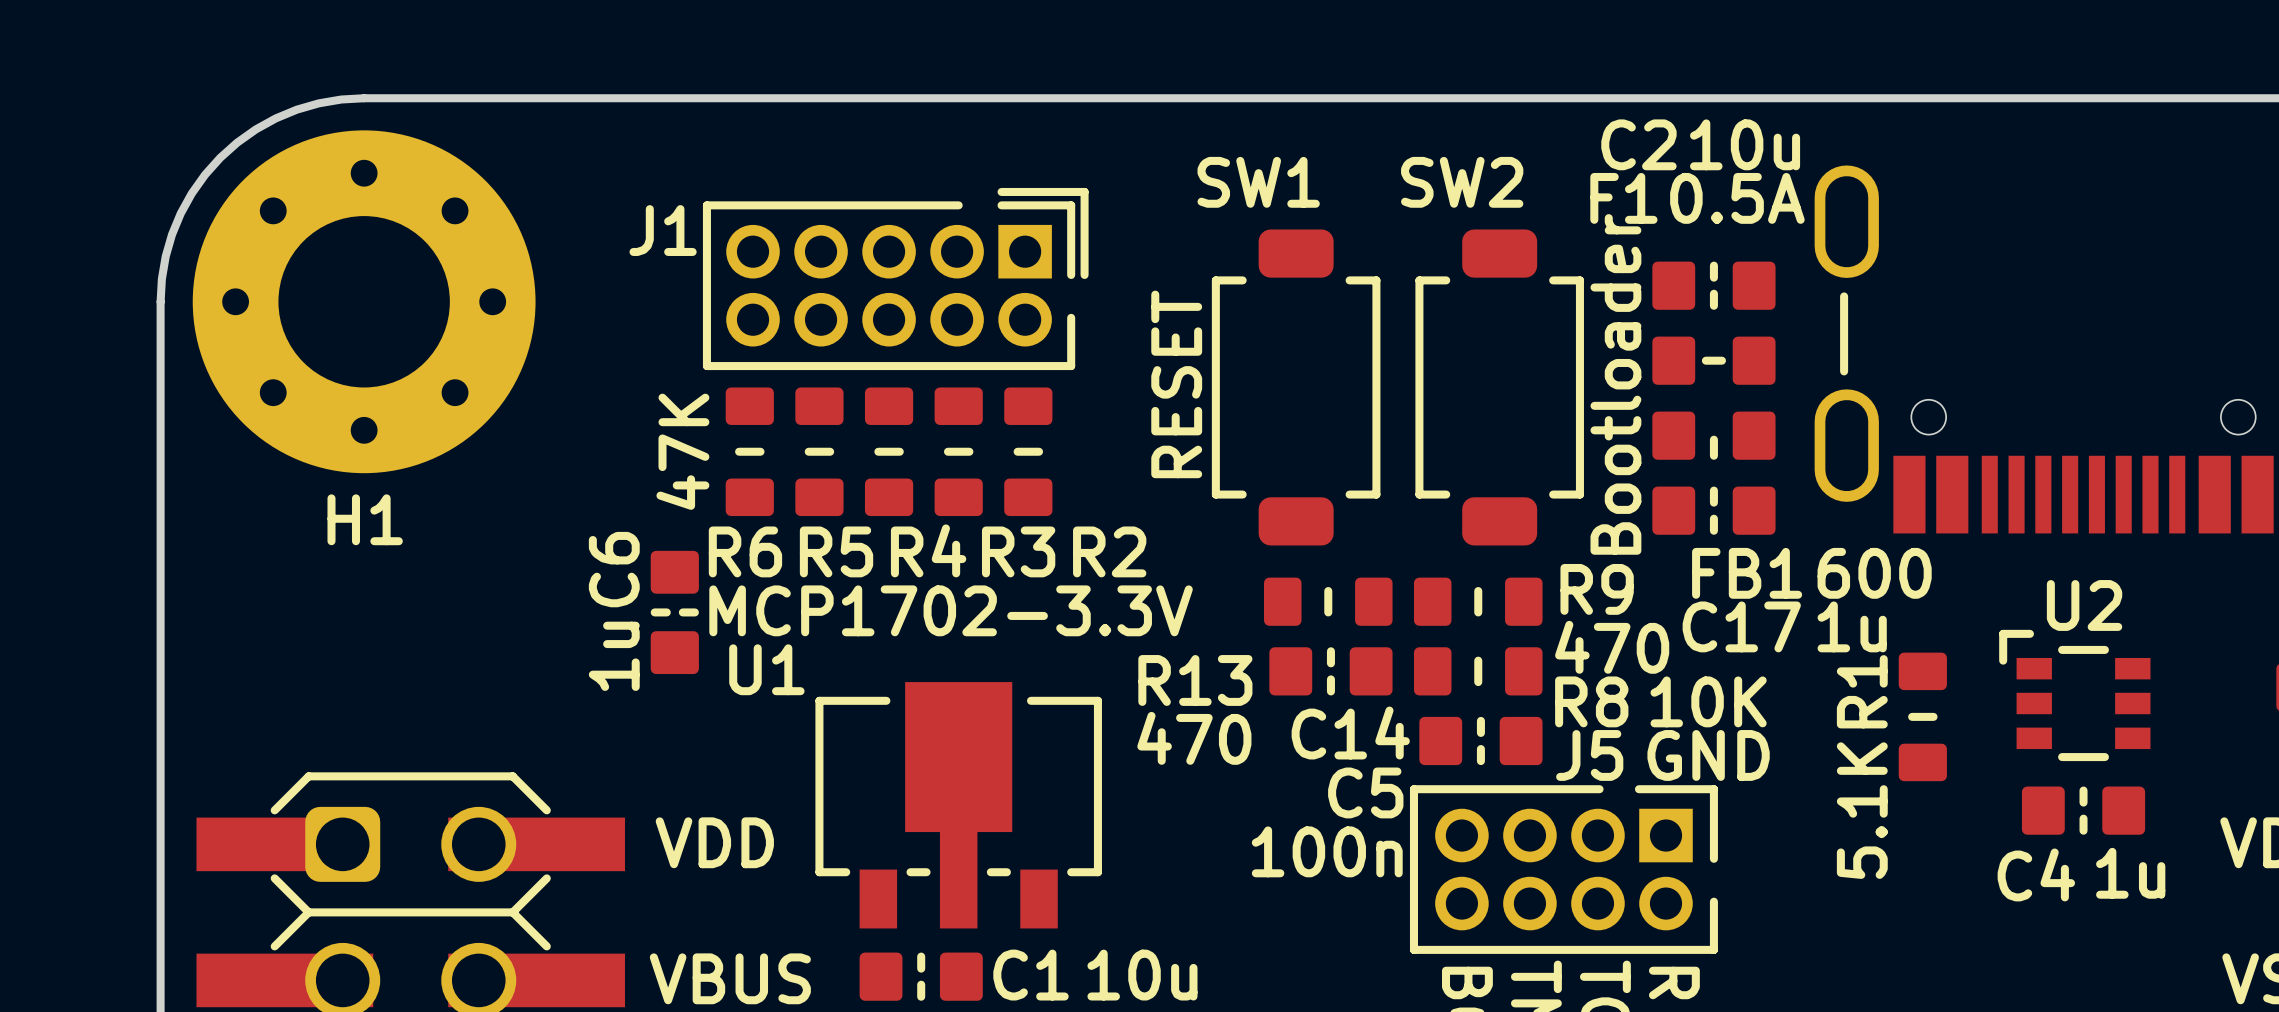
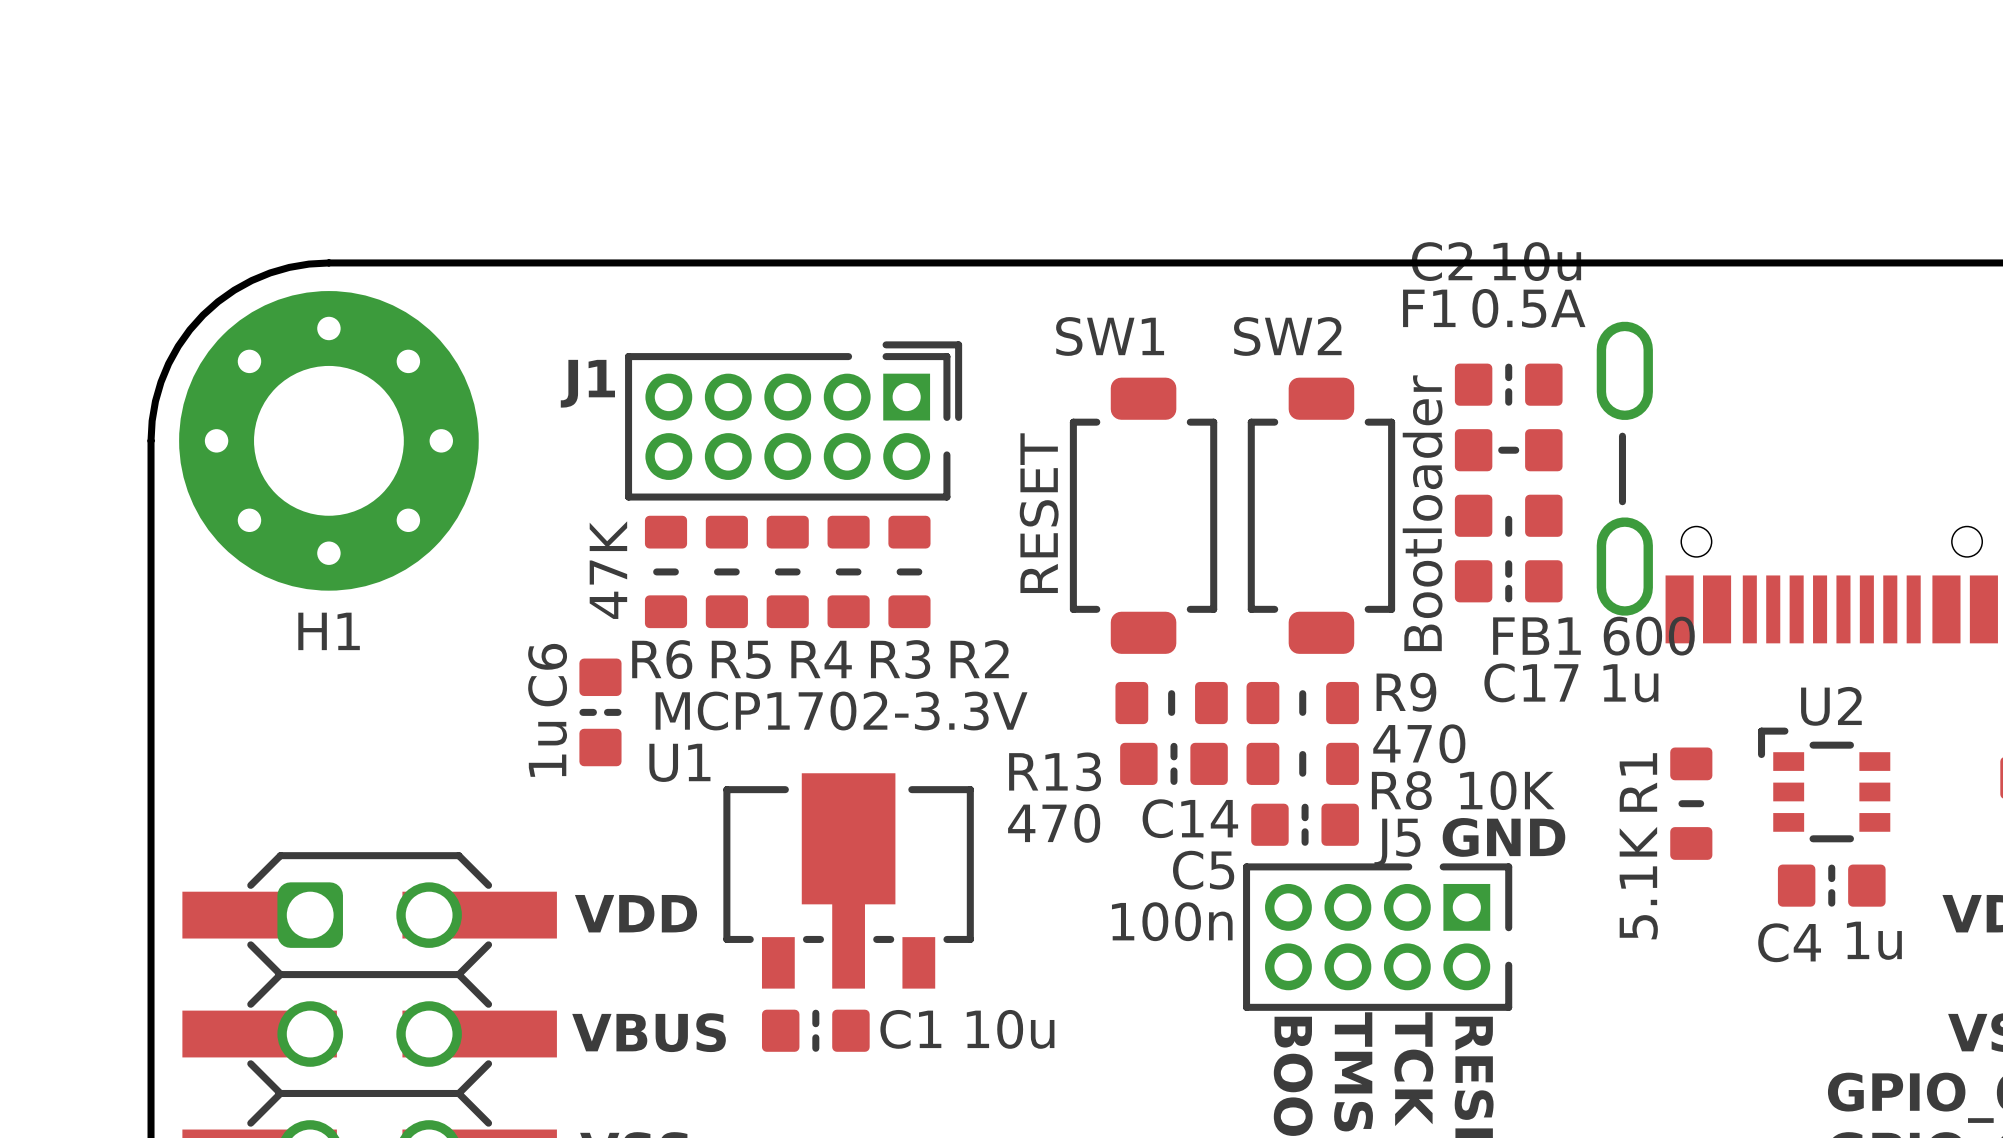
C2 position: (1713, 285) -> (1508, 384)
F1 position: (1713, 360) -> (1508, 450)
FB1 position: (1713, 435) -> (1508, 515)
C17 position: (1713, 510) -> (1508, 581)

